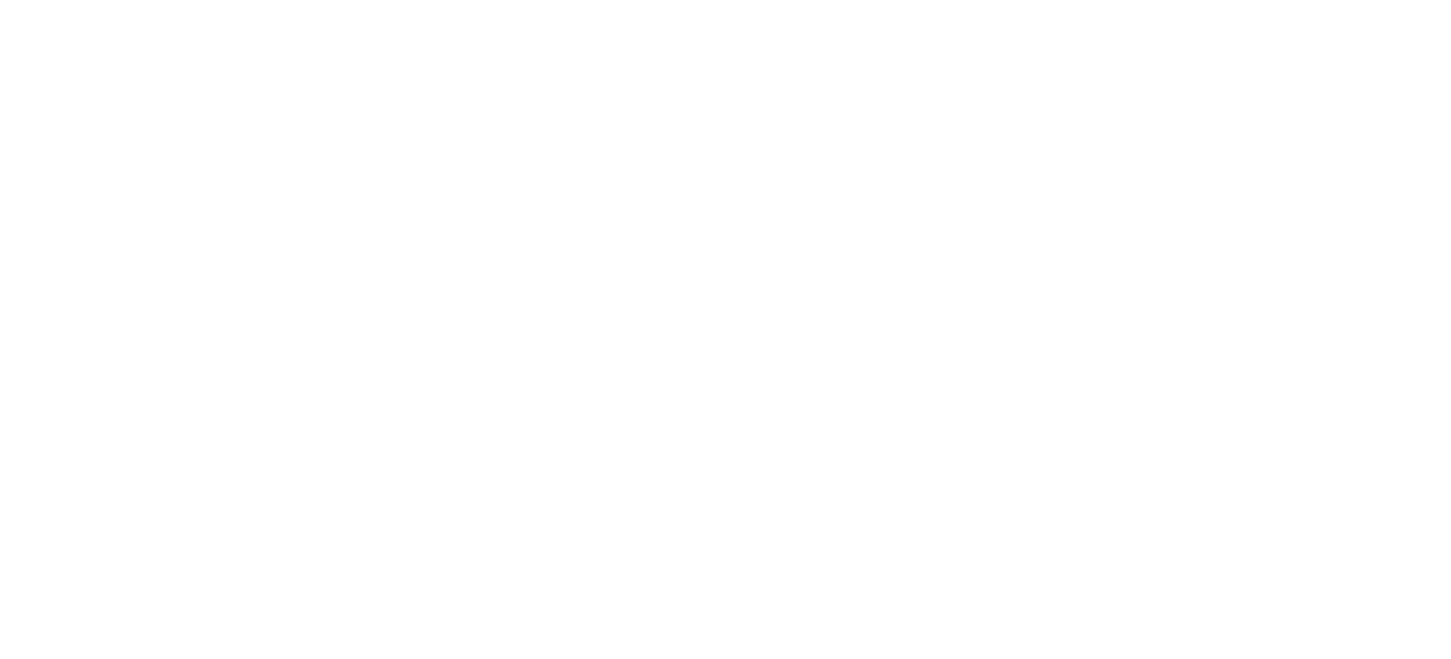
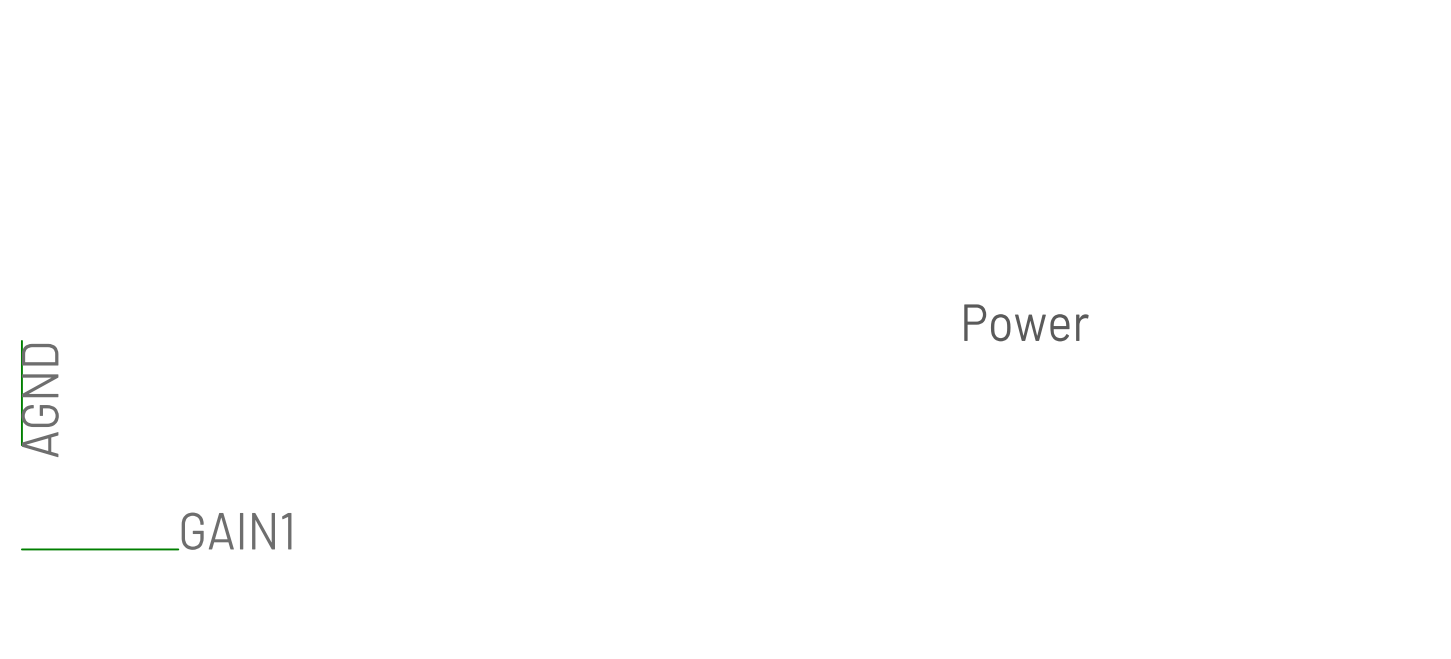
text: none -> Power (1026, 322)
wire: none -> (21, 340) (21, 445)
label: none -> AGND (40, 400)
label: none -> GAIN1 (236, 531)
wire: none -> (21, 549) (178, 549)

